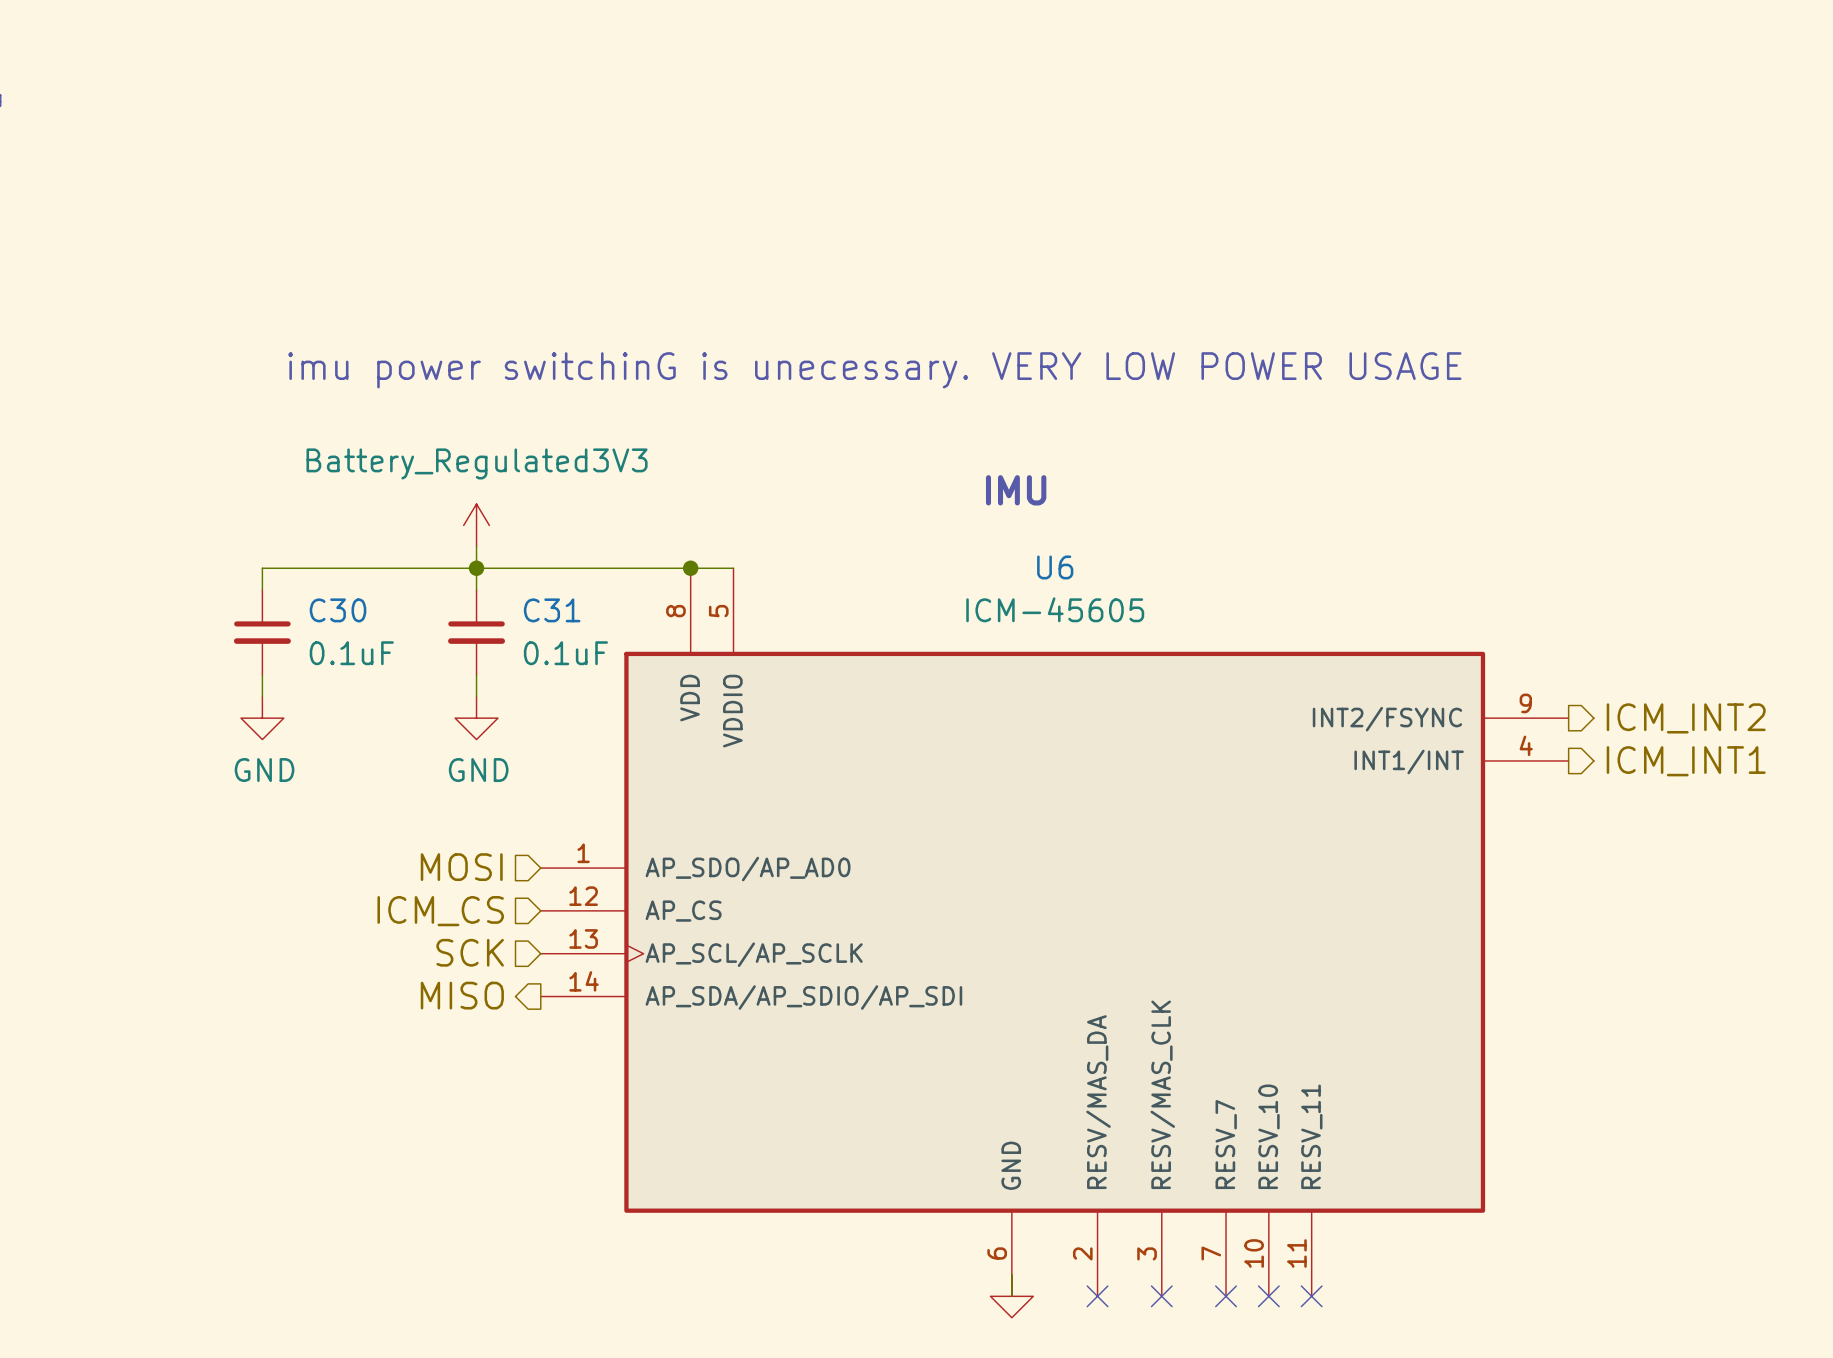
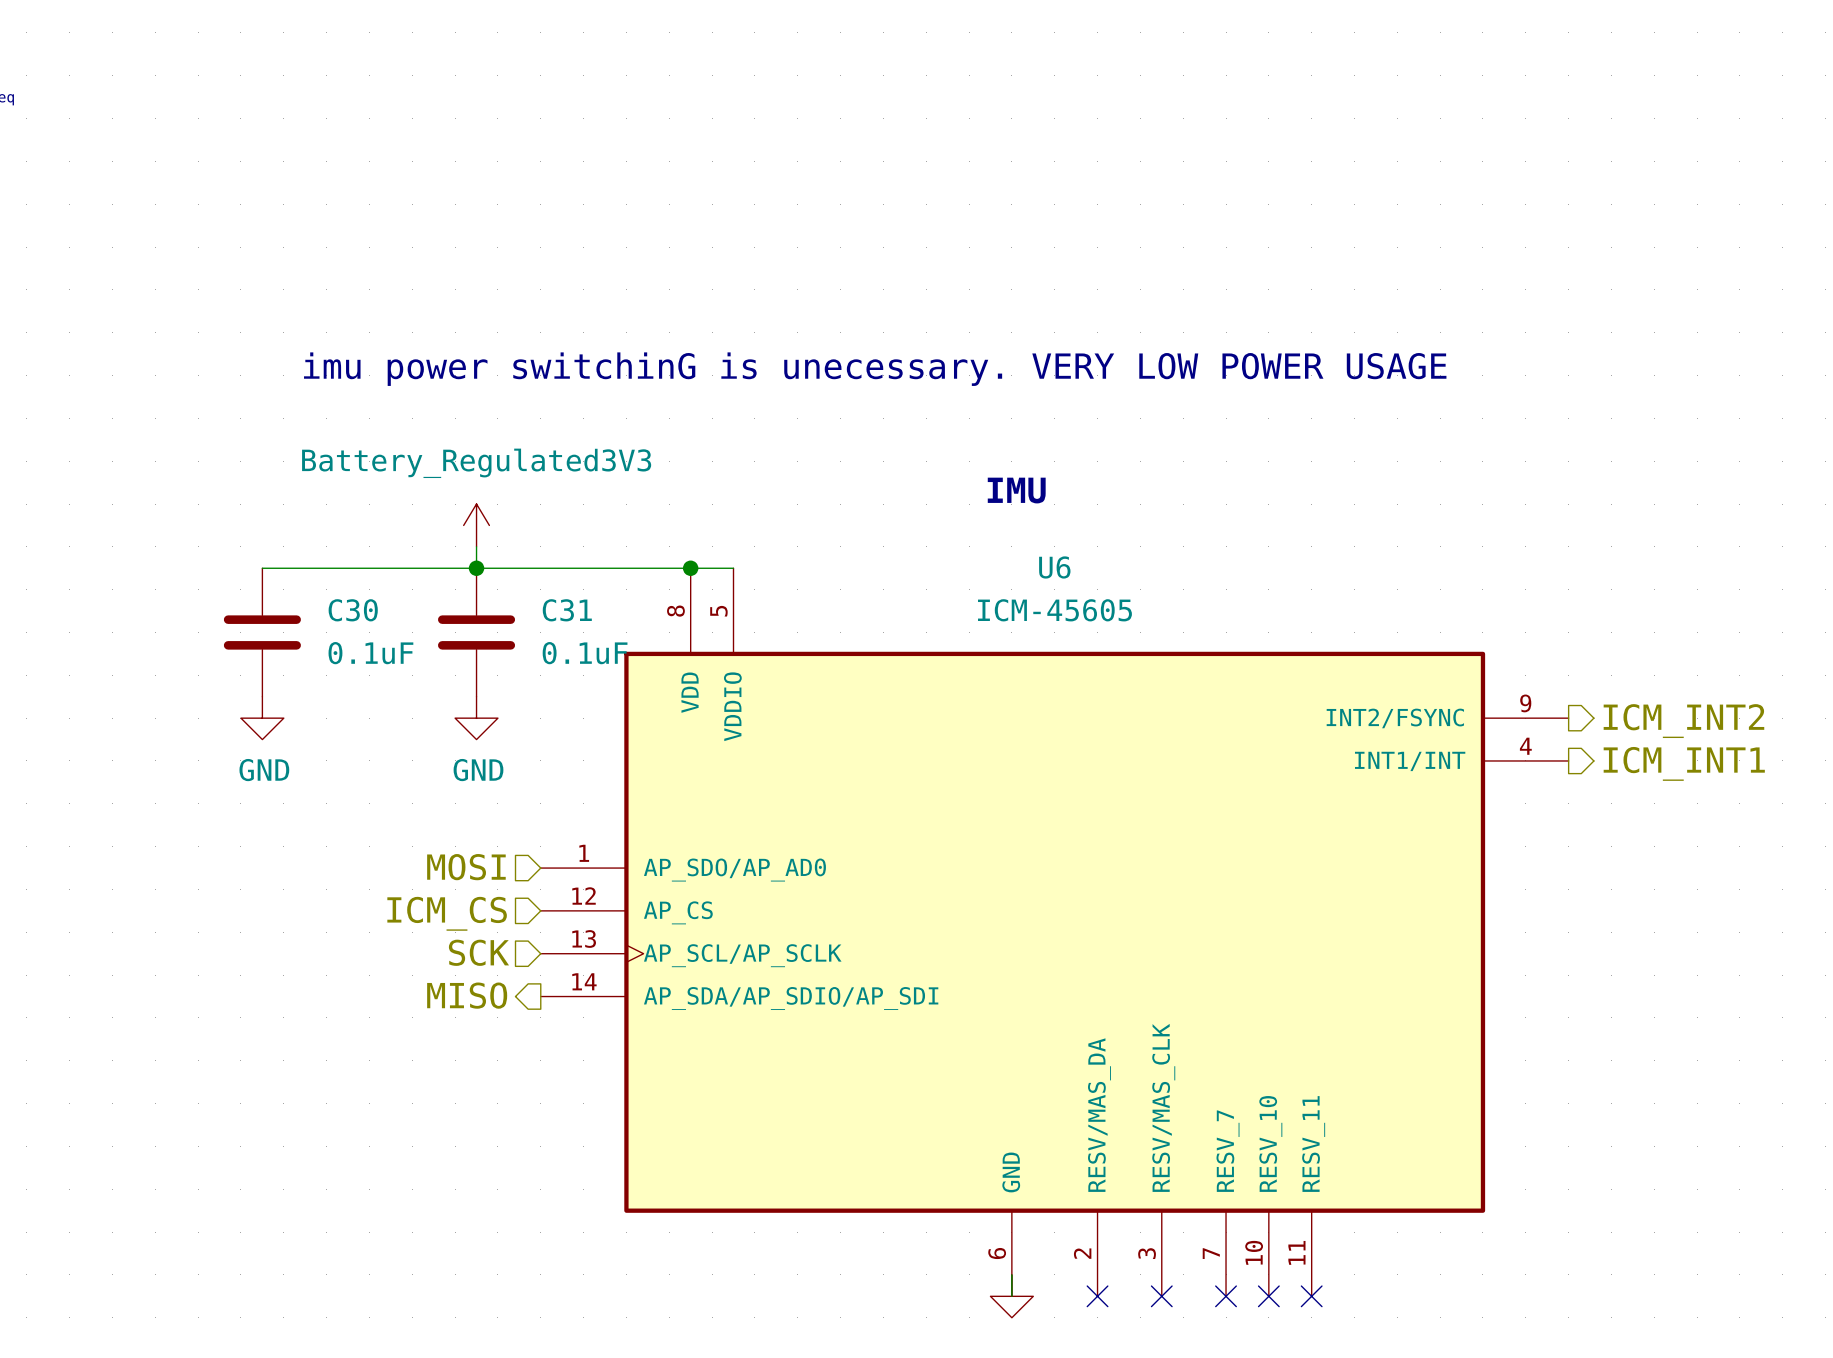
C30 symbol: [233, 589, 291, 676] -> [223, 568, 301, 697]
C31 symbol: [448, 589, 506, 676] -> [437, 568, 516, 697]

